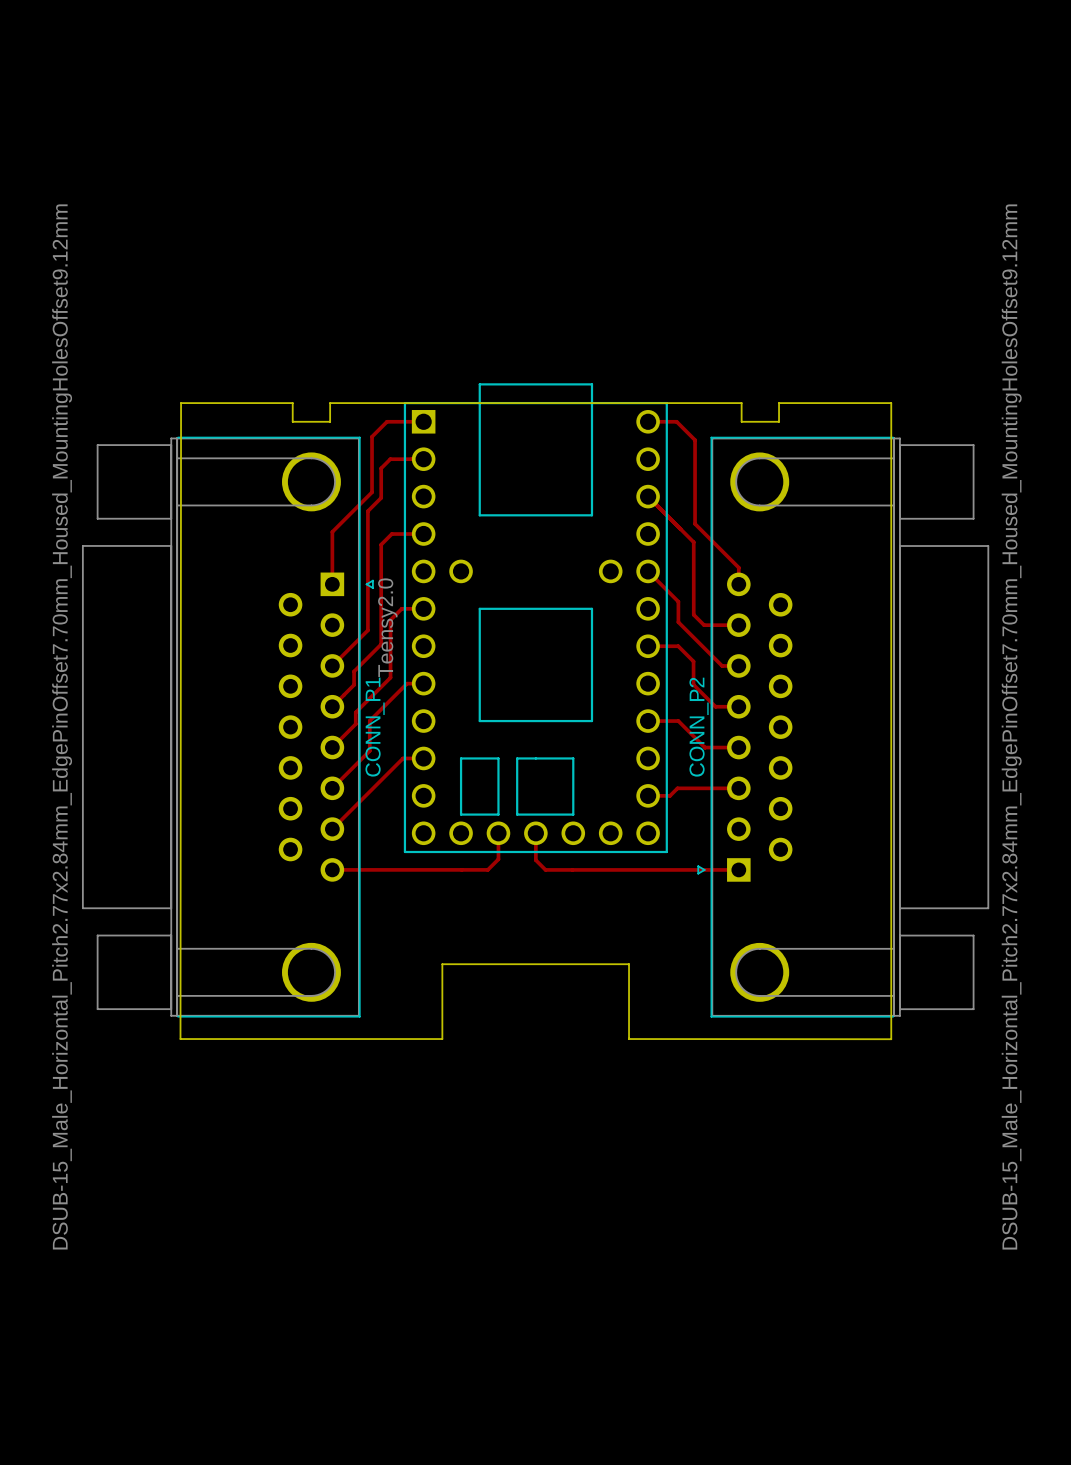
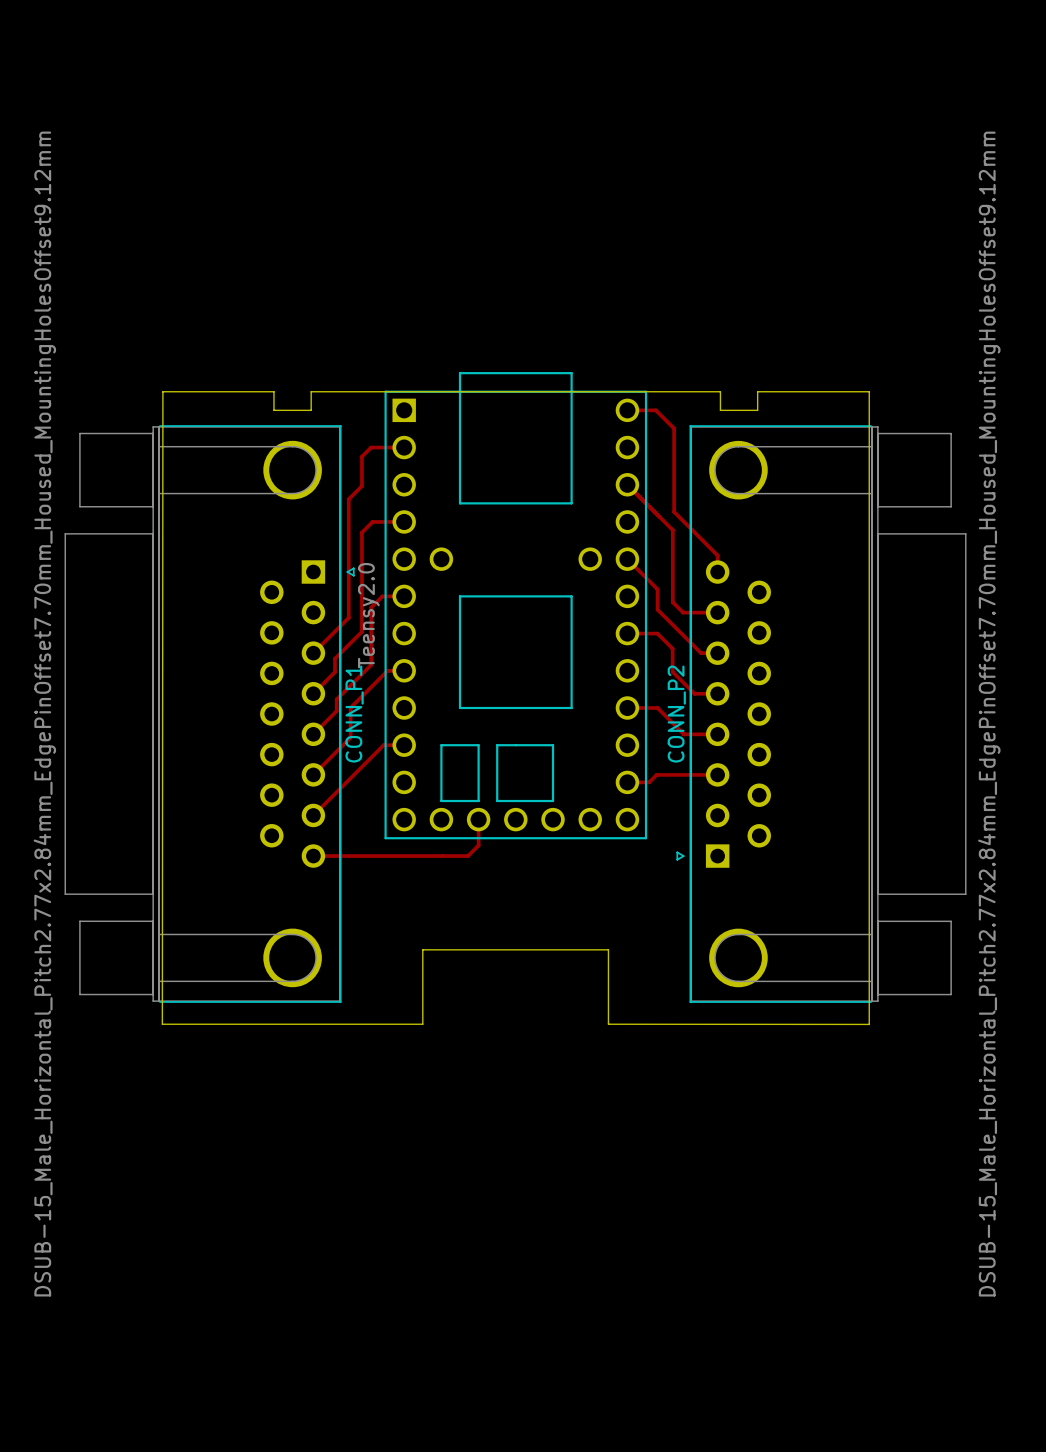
track: (423, 421) (386, 421) (372, 436) (372, 492) (332, 531) (332, 584) -> none
track: (535, 833) (535, 860) (545, 869) (738, 869) -> none

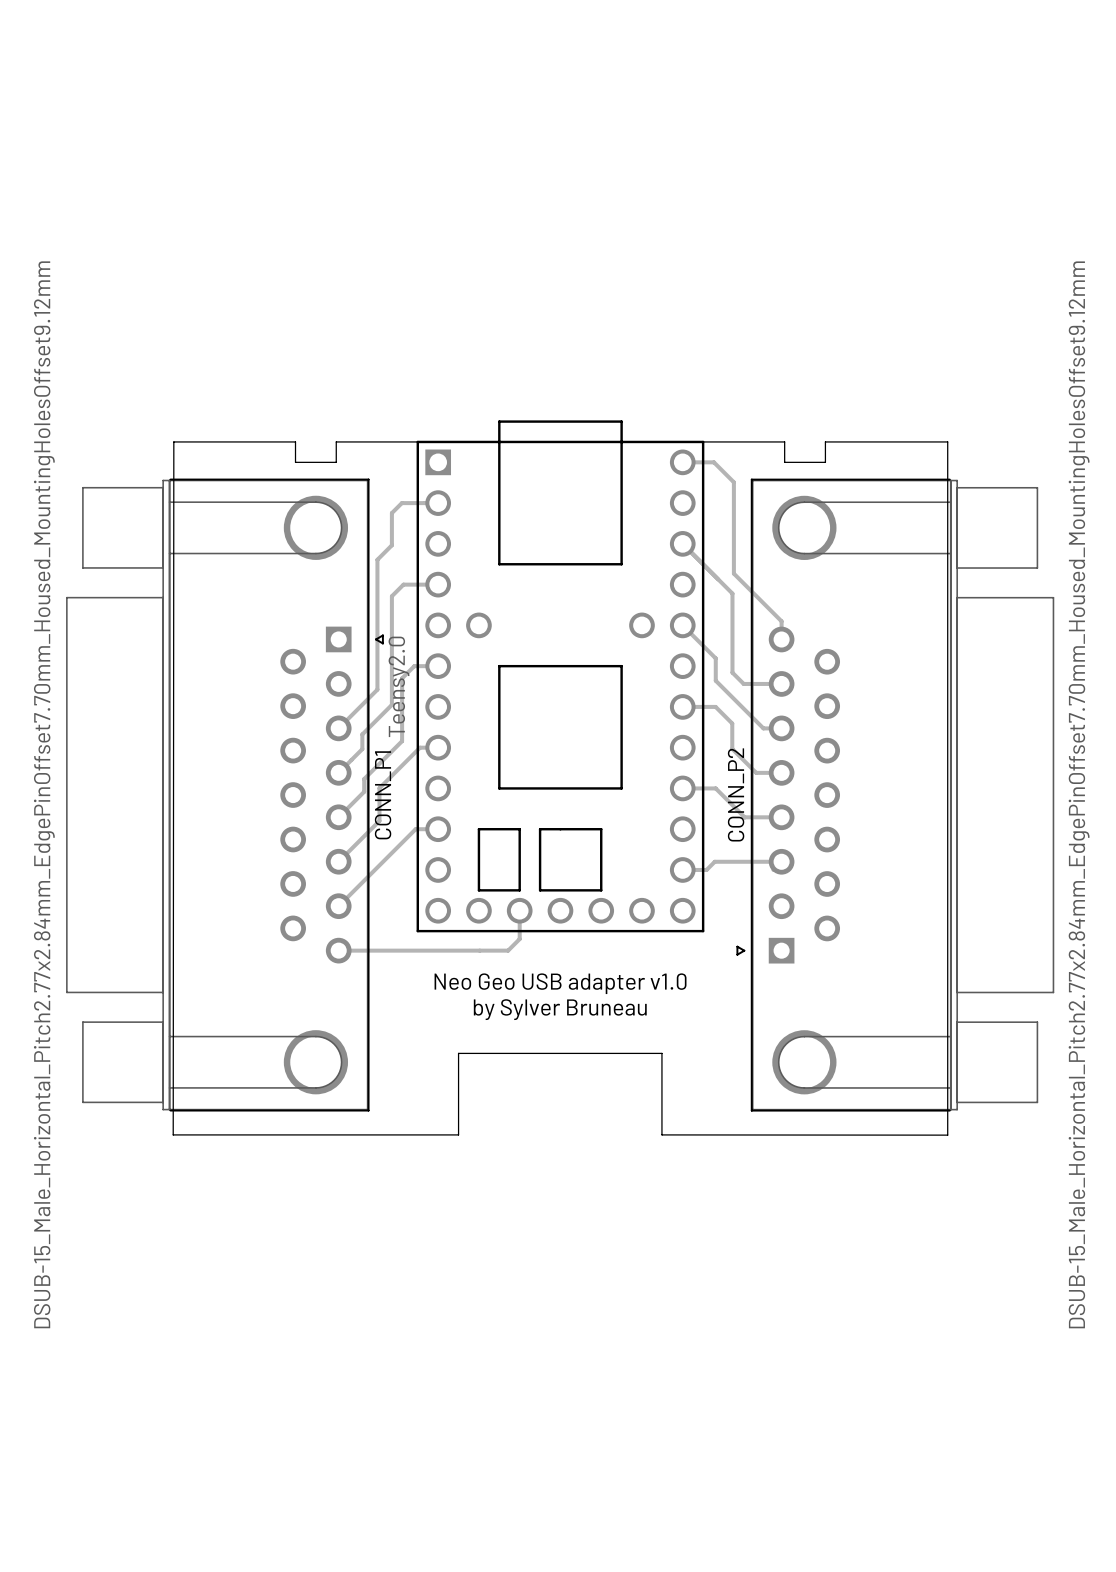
text: none -> Neo Geo USB adapter v1.0 (560, 983)
text: none -> by Sylver Bruneau (560, 1009)

